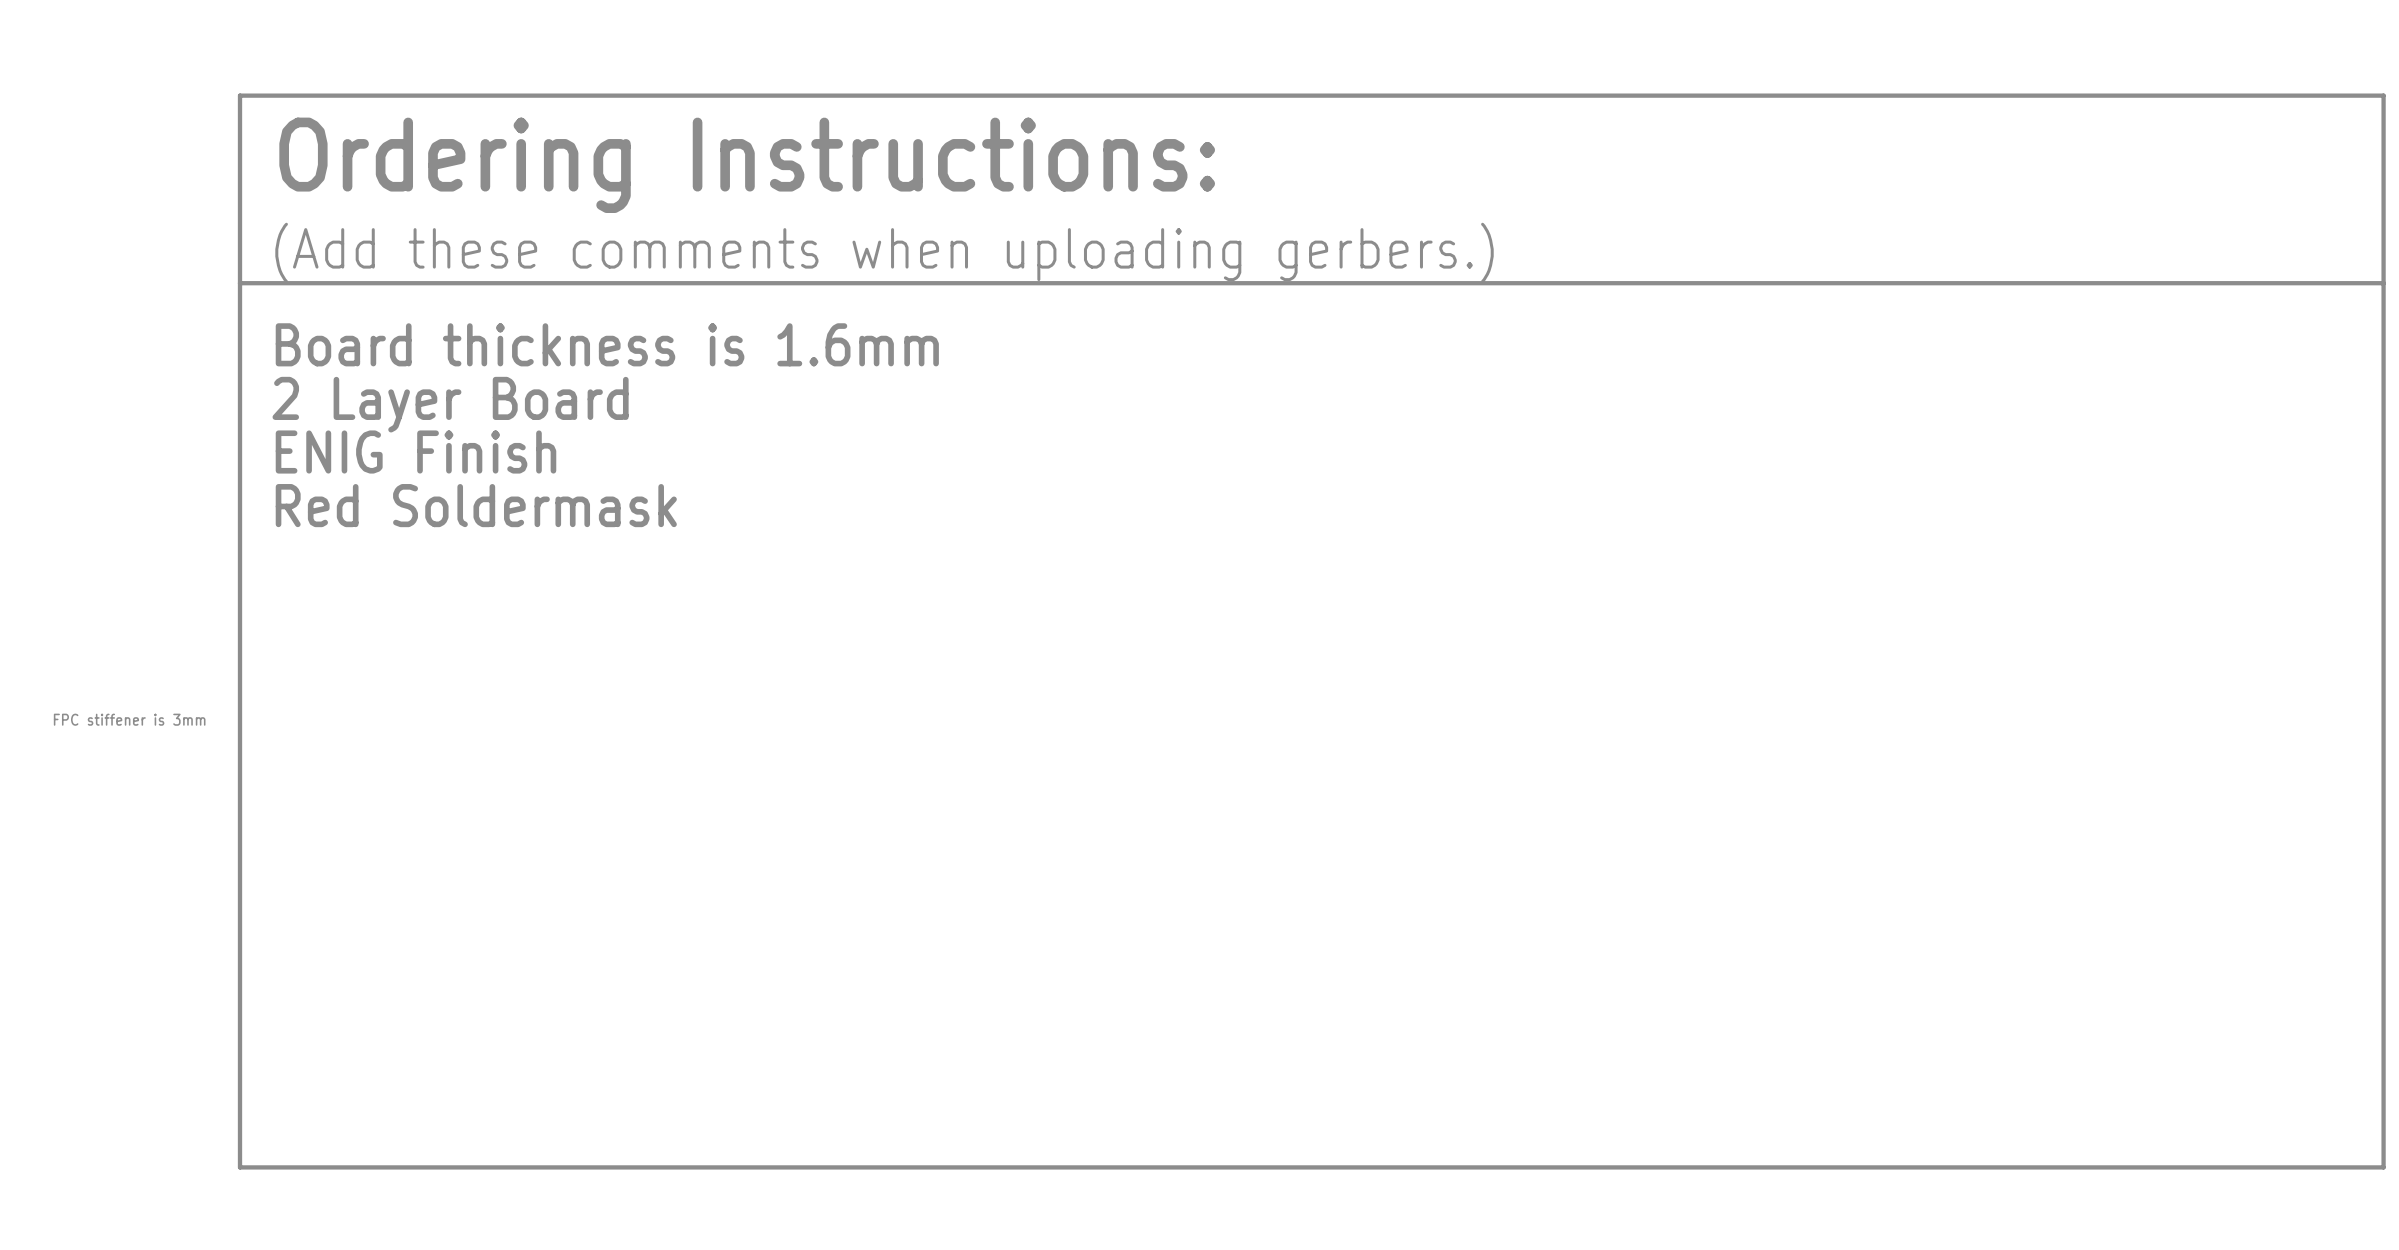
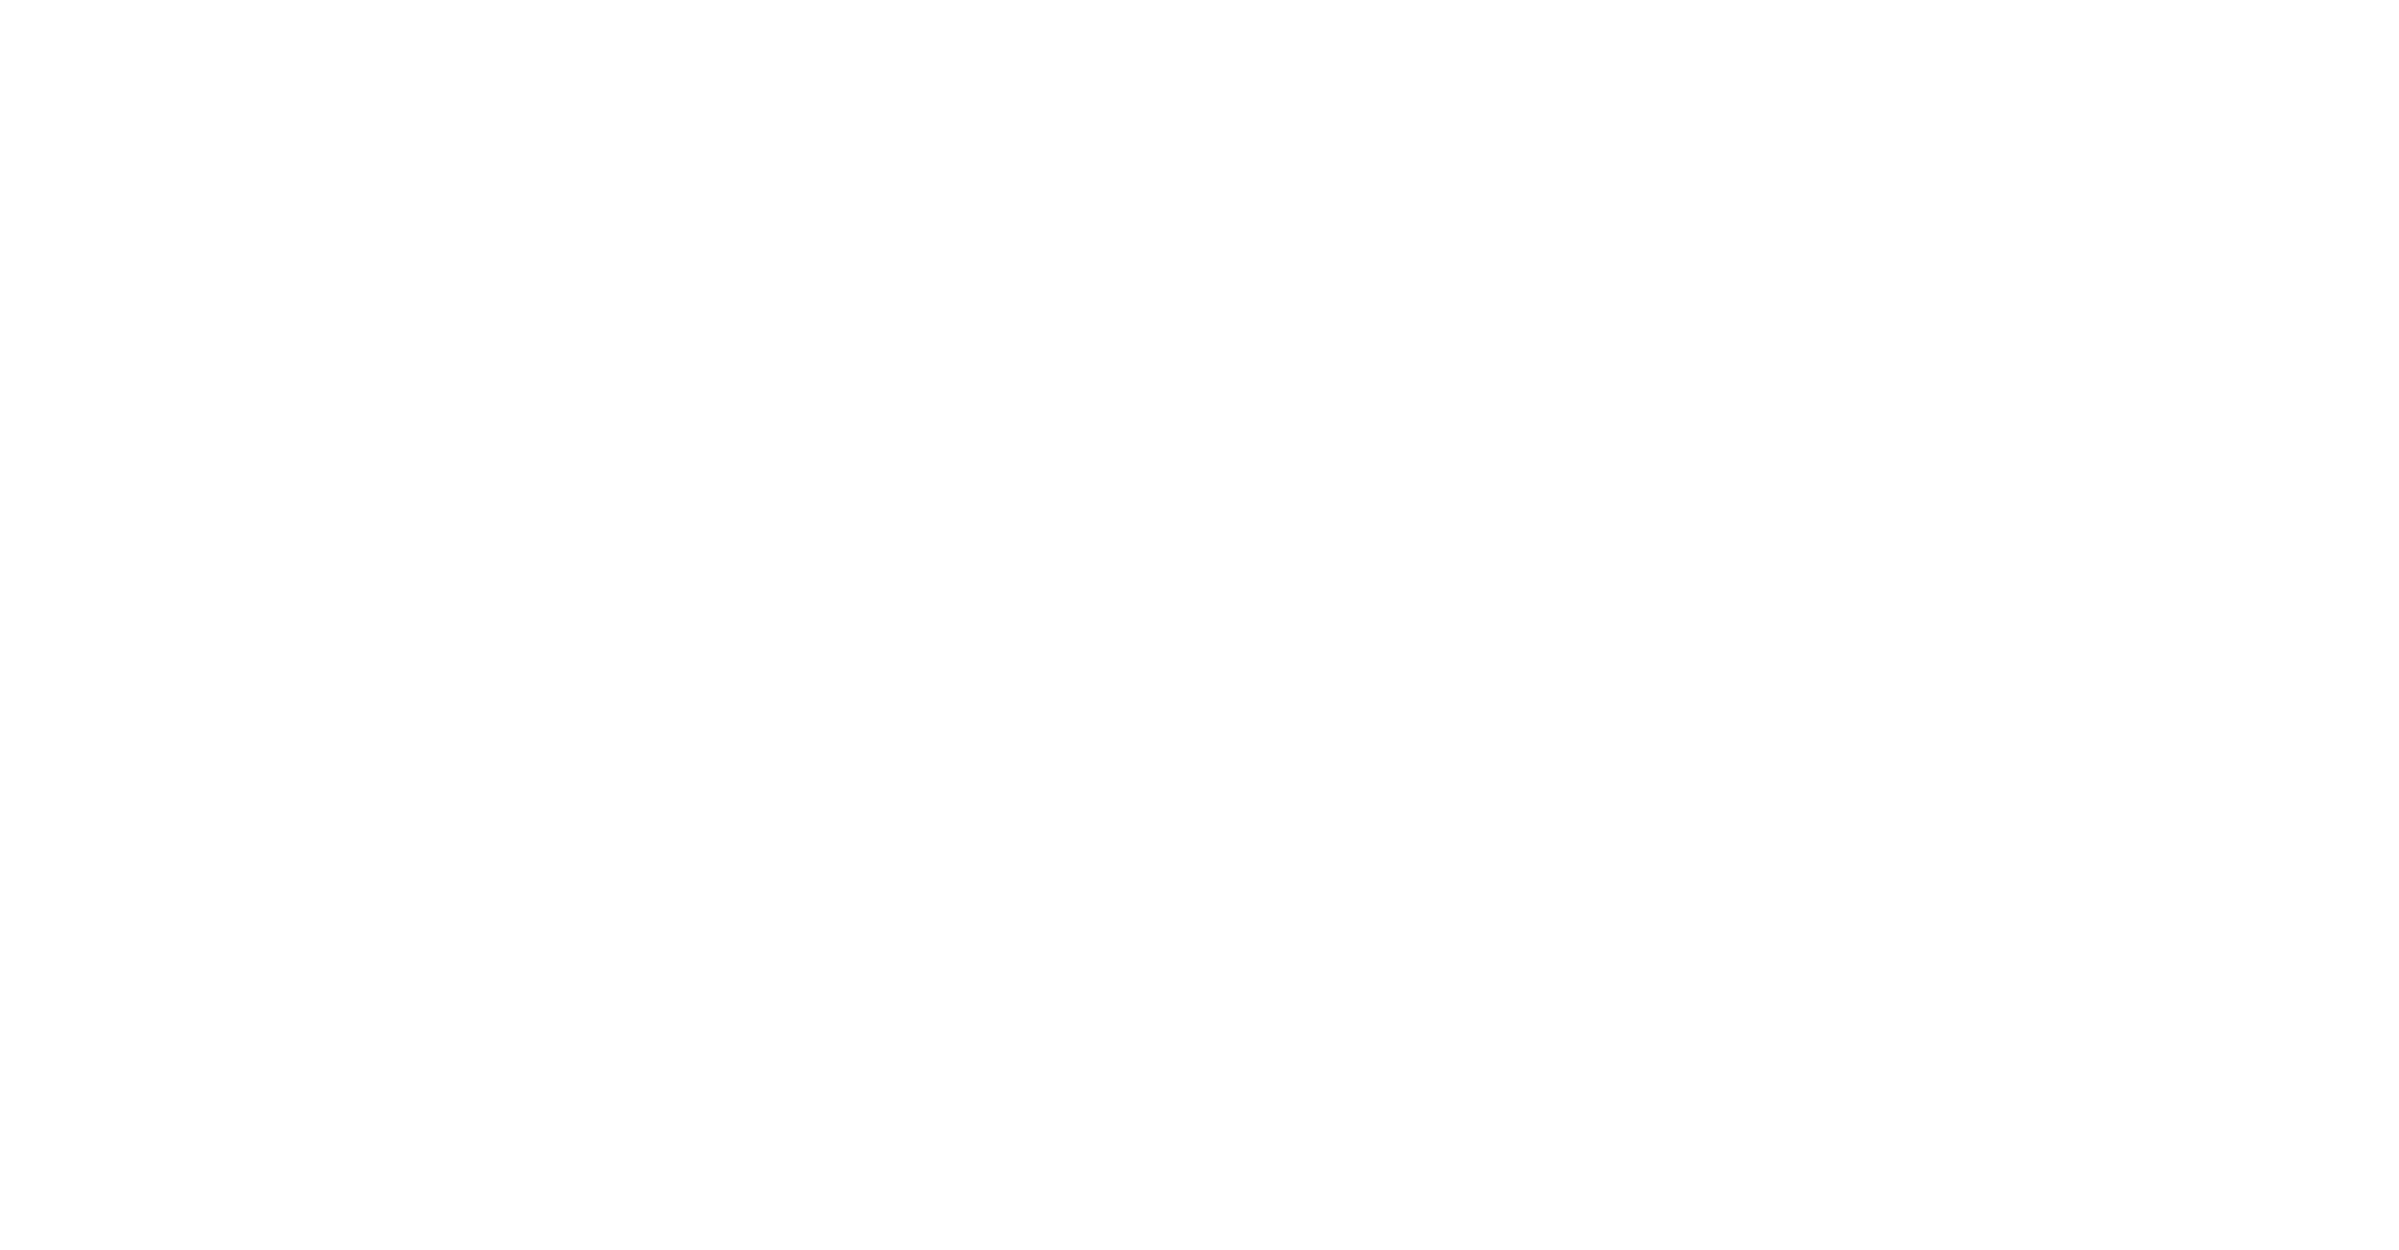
drawing: [237, 93, 2386, 1170] -> none
text: Board thickness is 1.6mm (607, 344) -> none
text: 2 Layer Board (450, 404) -> none
text: ENIG Finish (415, 452) -> none
text: Red Soldermask (476, 505) -> none
text: FPC stiffener is 3mm (129, 719) -> none

